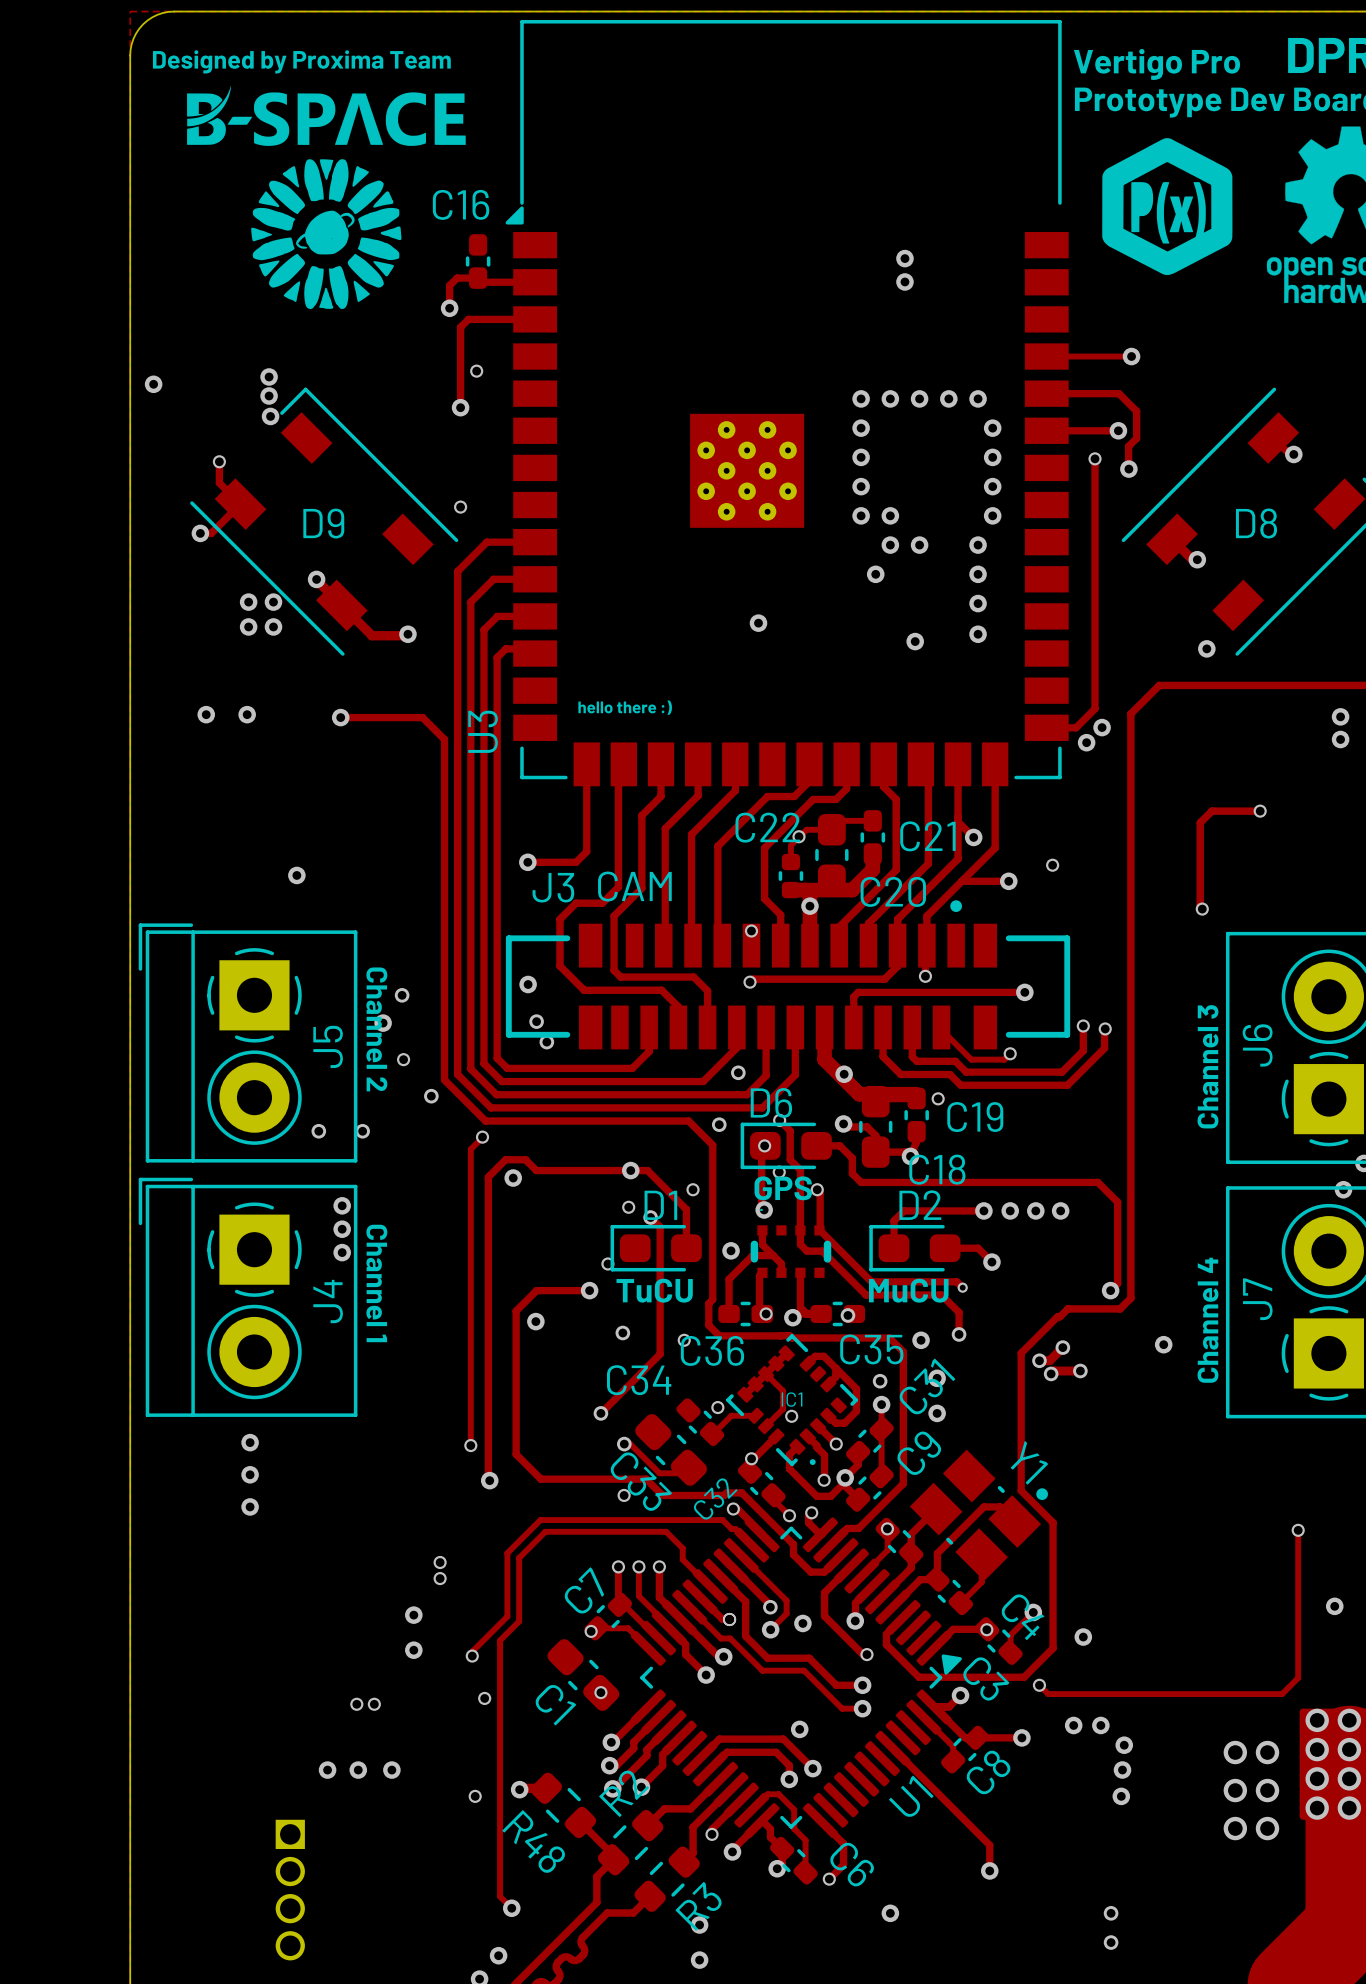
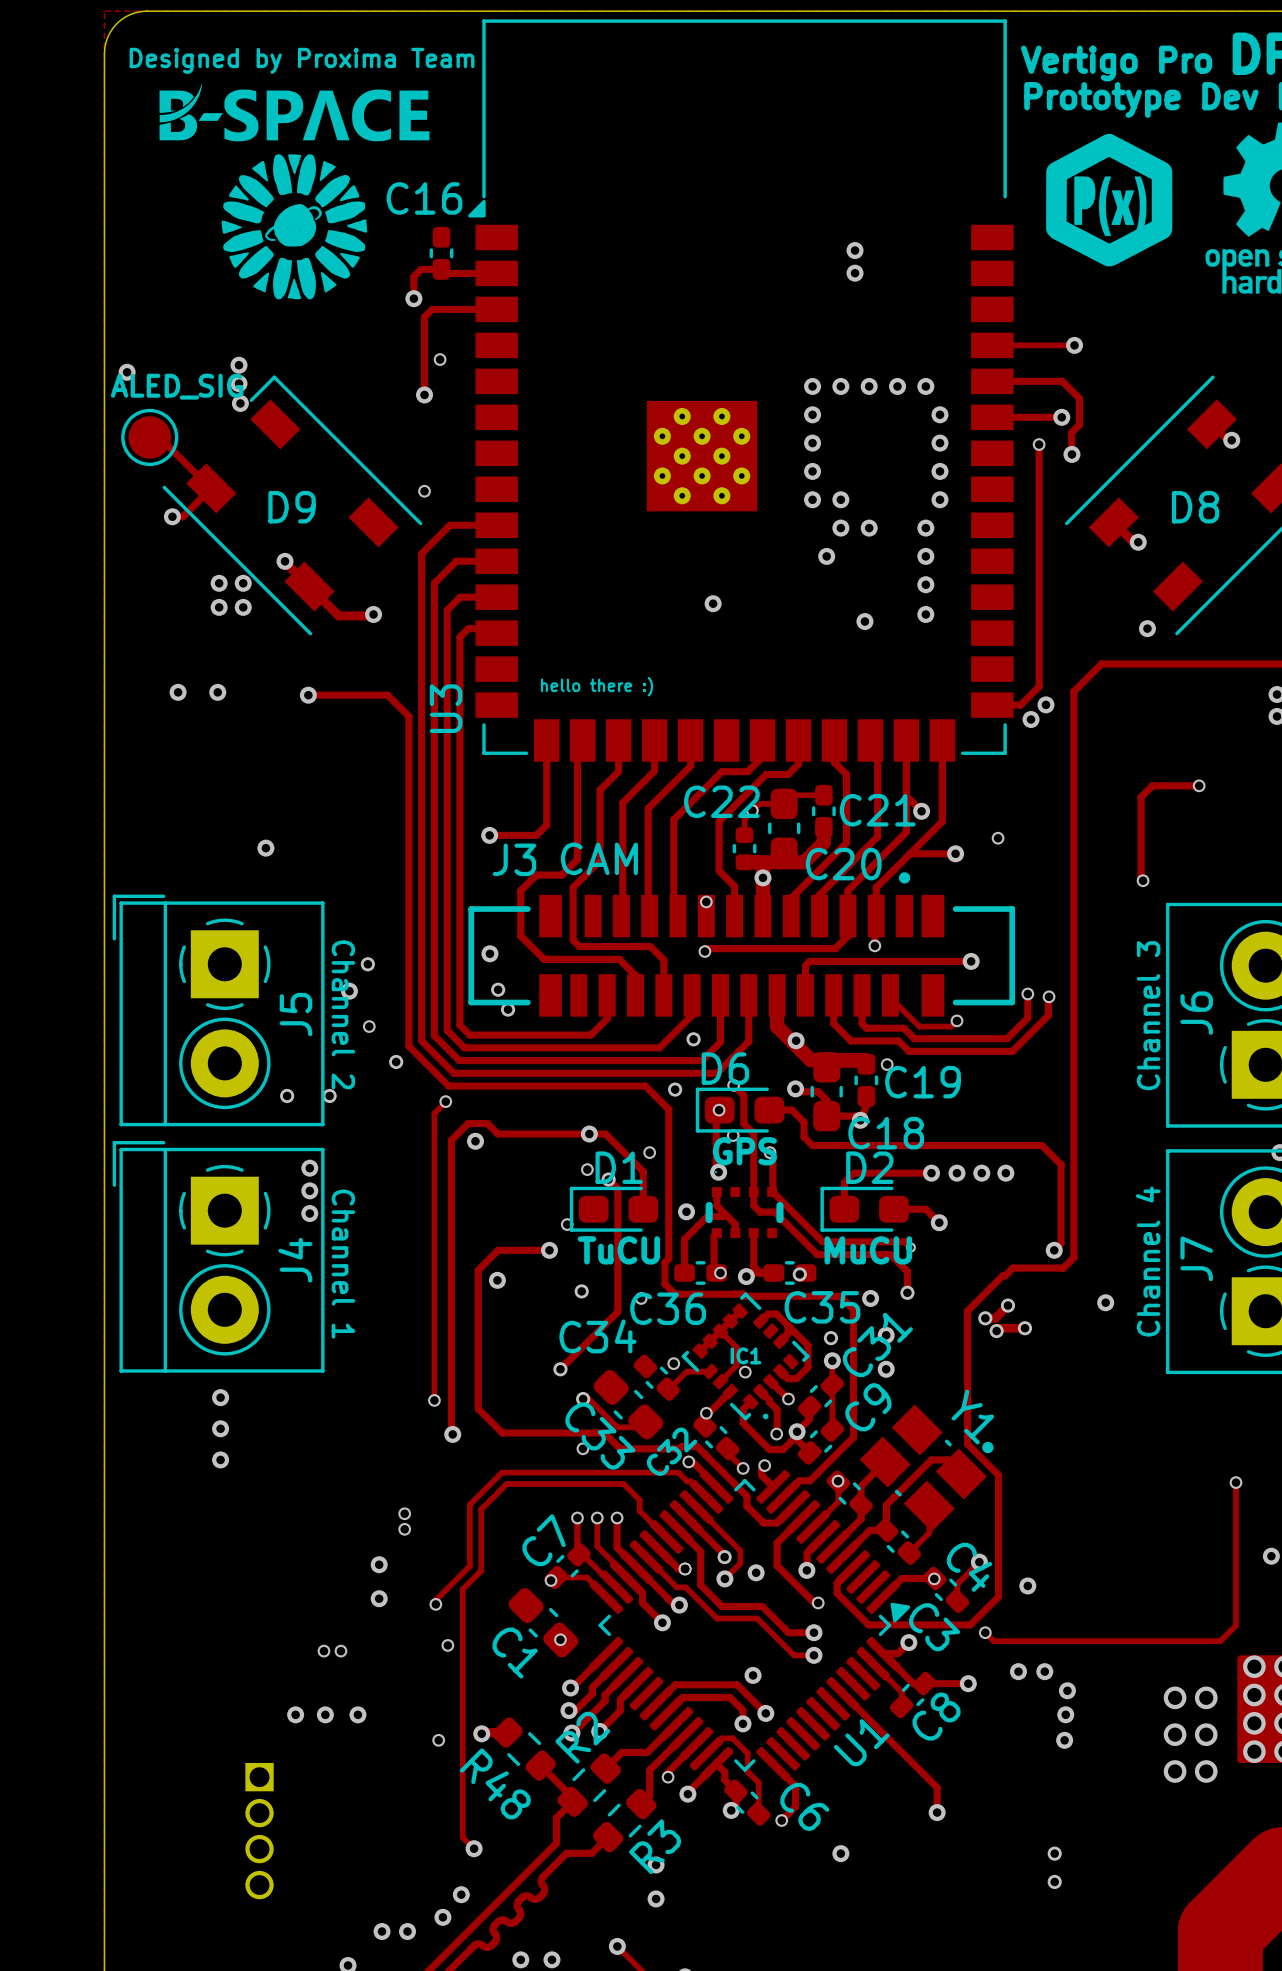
ALED_SIG: none -> (149, 437)
track: (219, 461) (219, 483) (240, 504) -> (149, 437) (159, 437) (210, 488)
via: (219, 461) -> none

